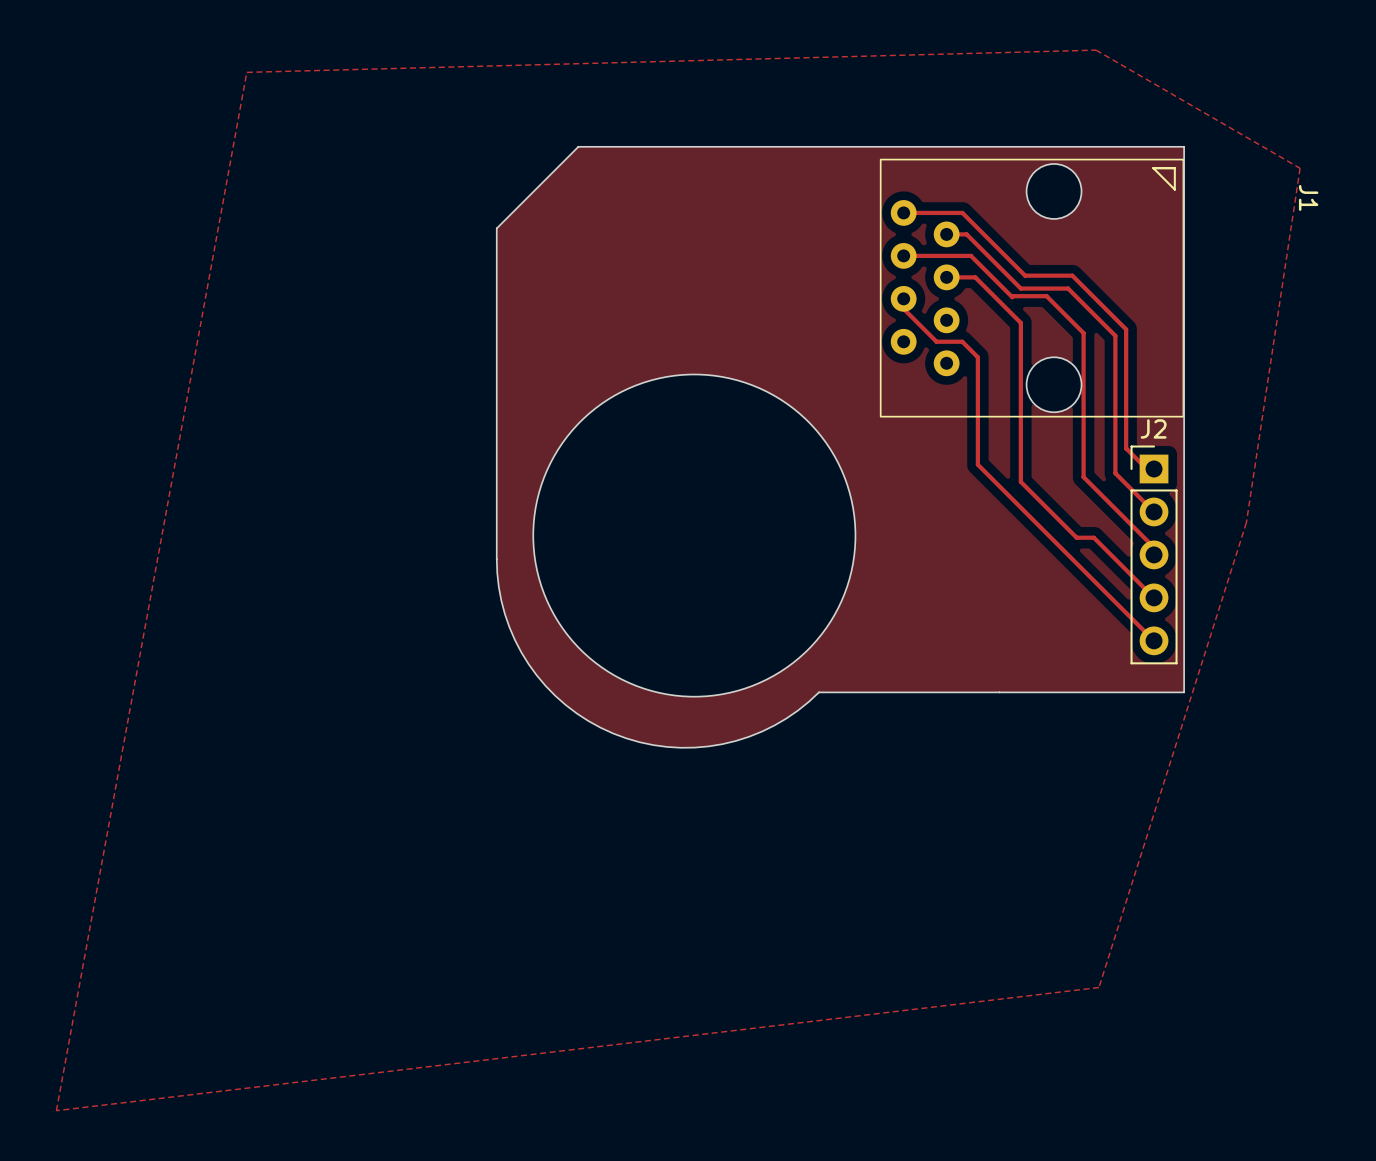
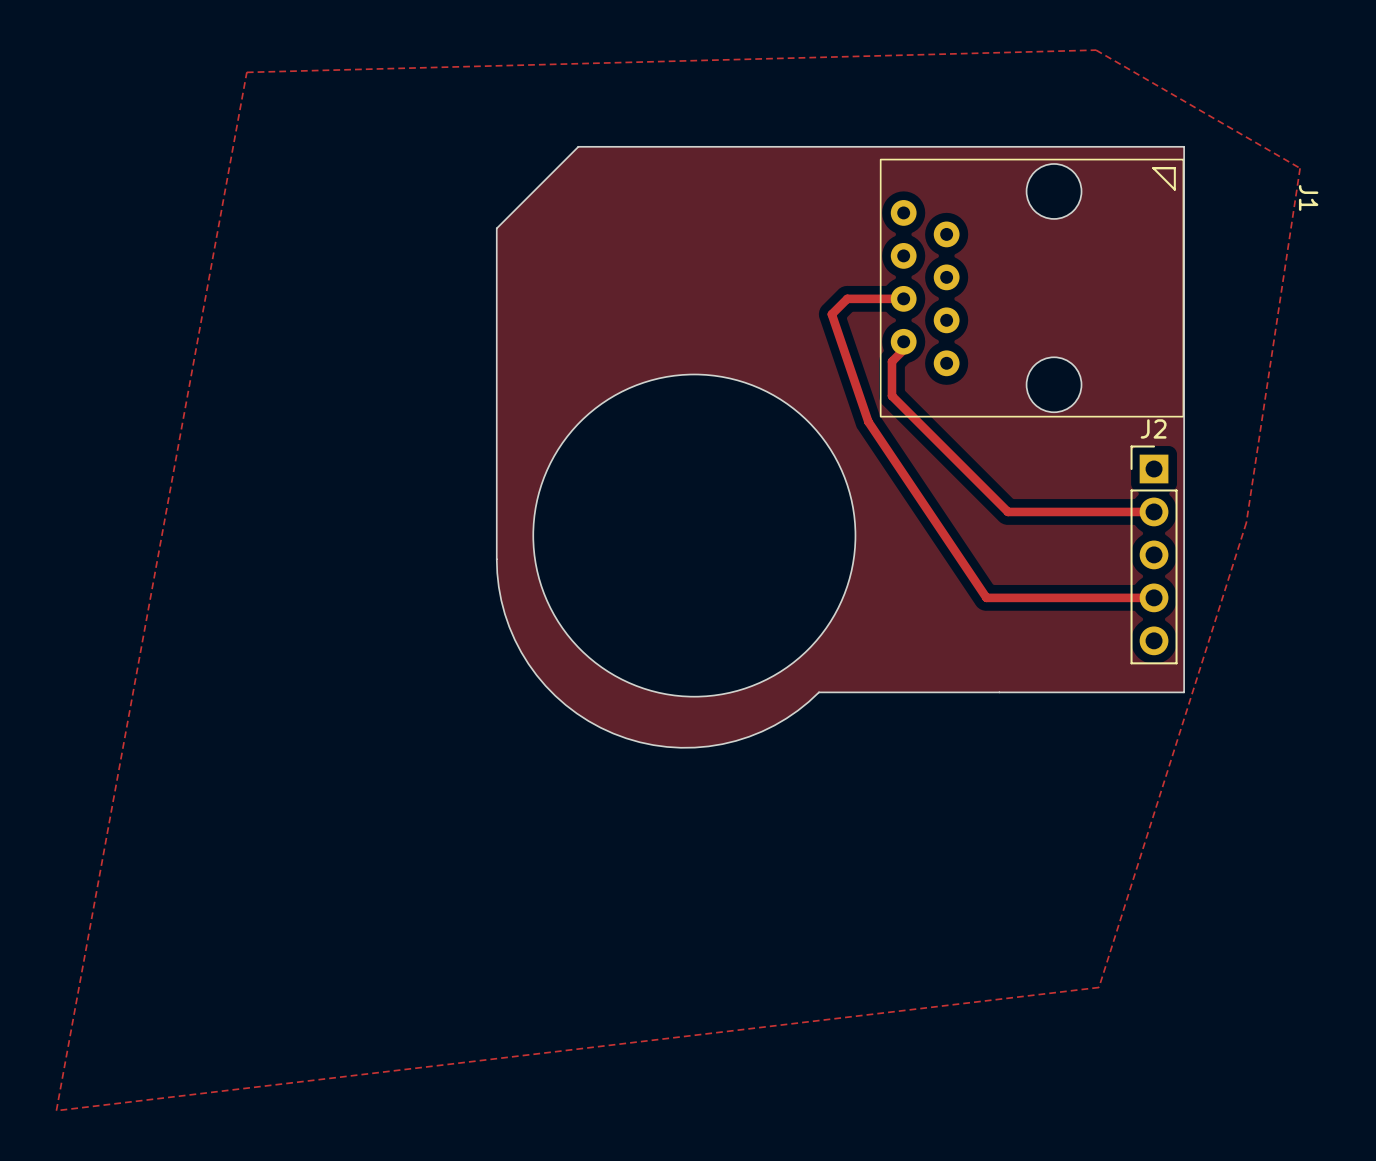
track: (903, 212) (962, 212) (1025, 275) (1072, 275) (1126, 329) (1126, 448) (1146, 469) (1154, 469) -> none
track: (946, 234) (966, 234) (1020, 288) (1068, 288) (1115, 335) (1115, 473) (1154, 511) -> (903, 341) (903, 349) (891, 361) (891, 395) (1007, 511) (1154, 511)
track: (903, 255) (971, 255) (1012, 297) (1046, 296) (1083, 333) (1083, 477) (1154, 547) (1154, 554) -> none
track: (946, 277) (975, 277) (1020, 322) (1020, 481) (1076, 537) (1093, 537) (1154, 597) -> (903, 298) (847, 298) (831, 314) (868, 421) (986, 597) (1154, 597)
track: (904, 310) (936, 341) (962, 341) (977, 357) (977, 464) (1154, 640) -> none

